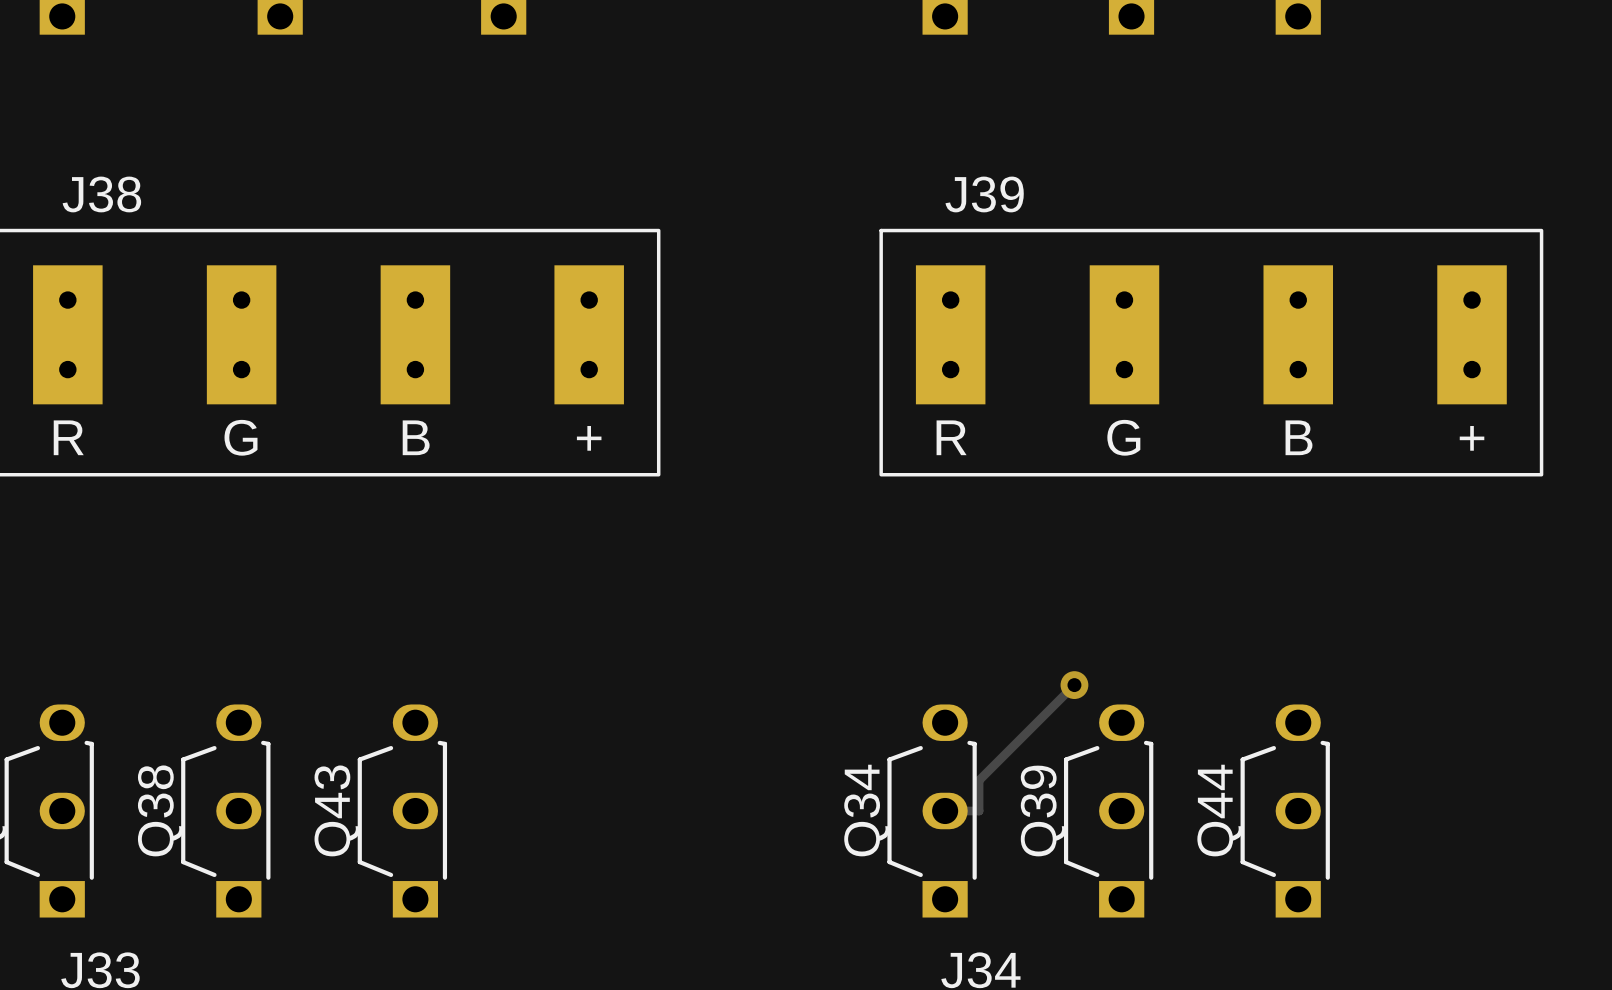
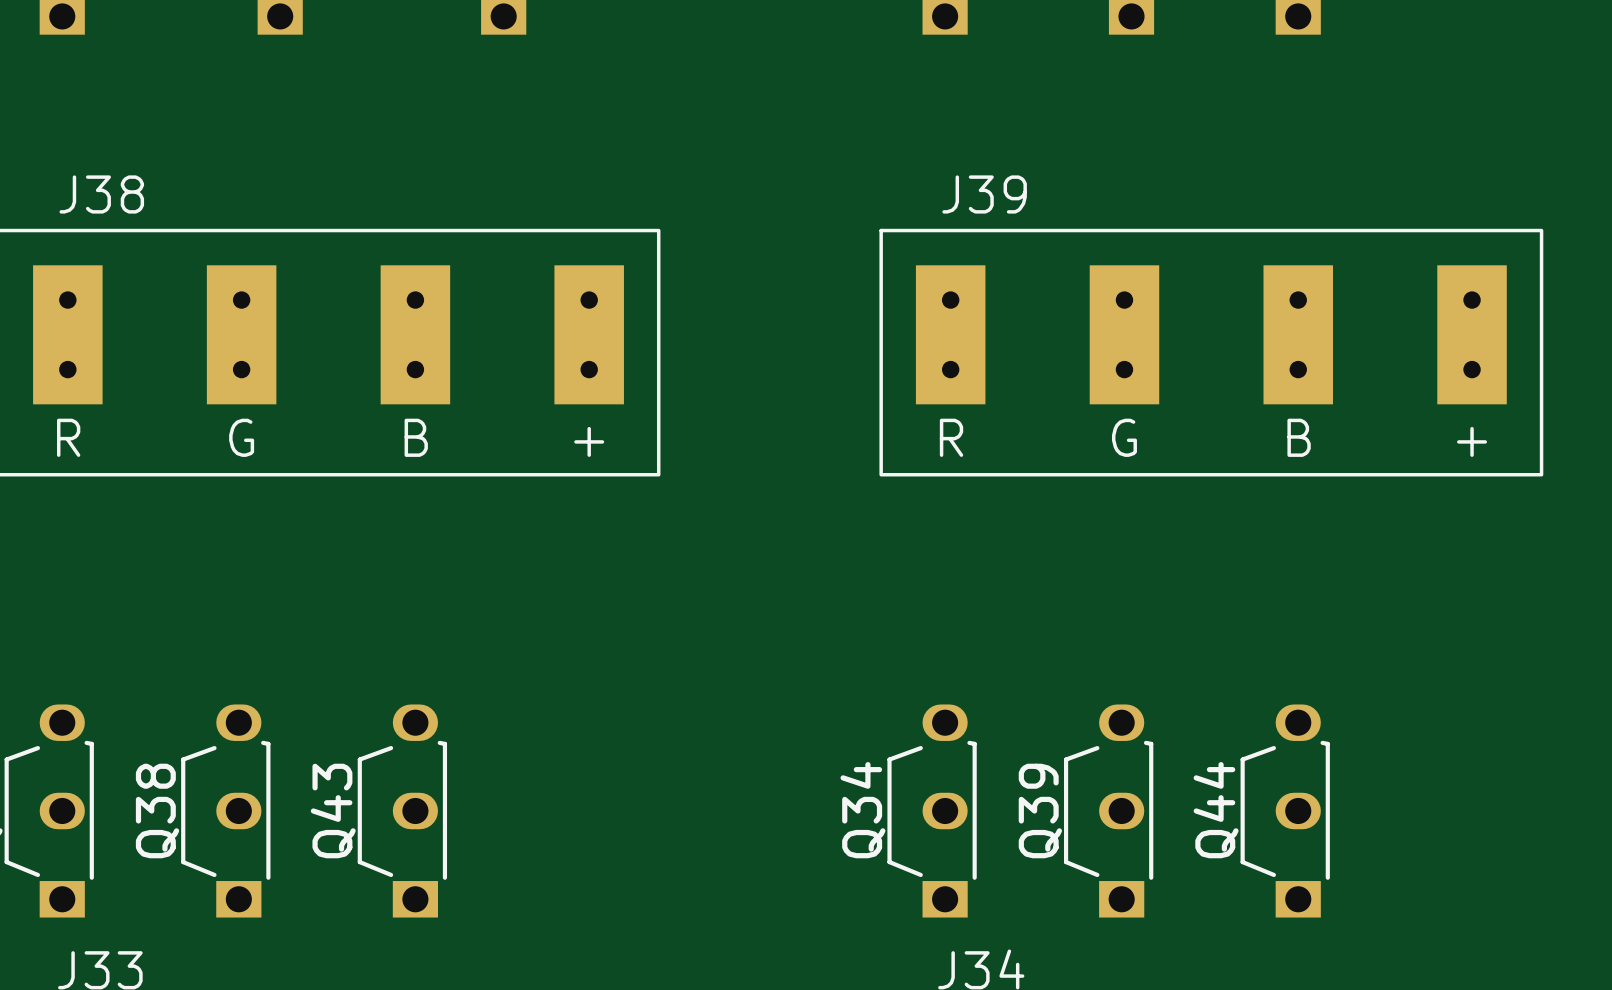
track: (1074, 685) (979, 780) (979, 810) (945, 810) -> none
via: (1074, 685) -> none

